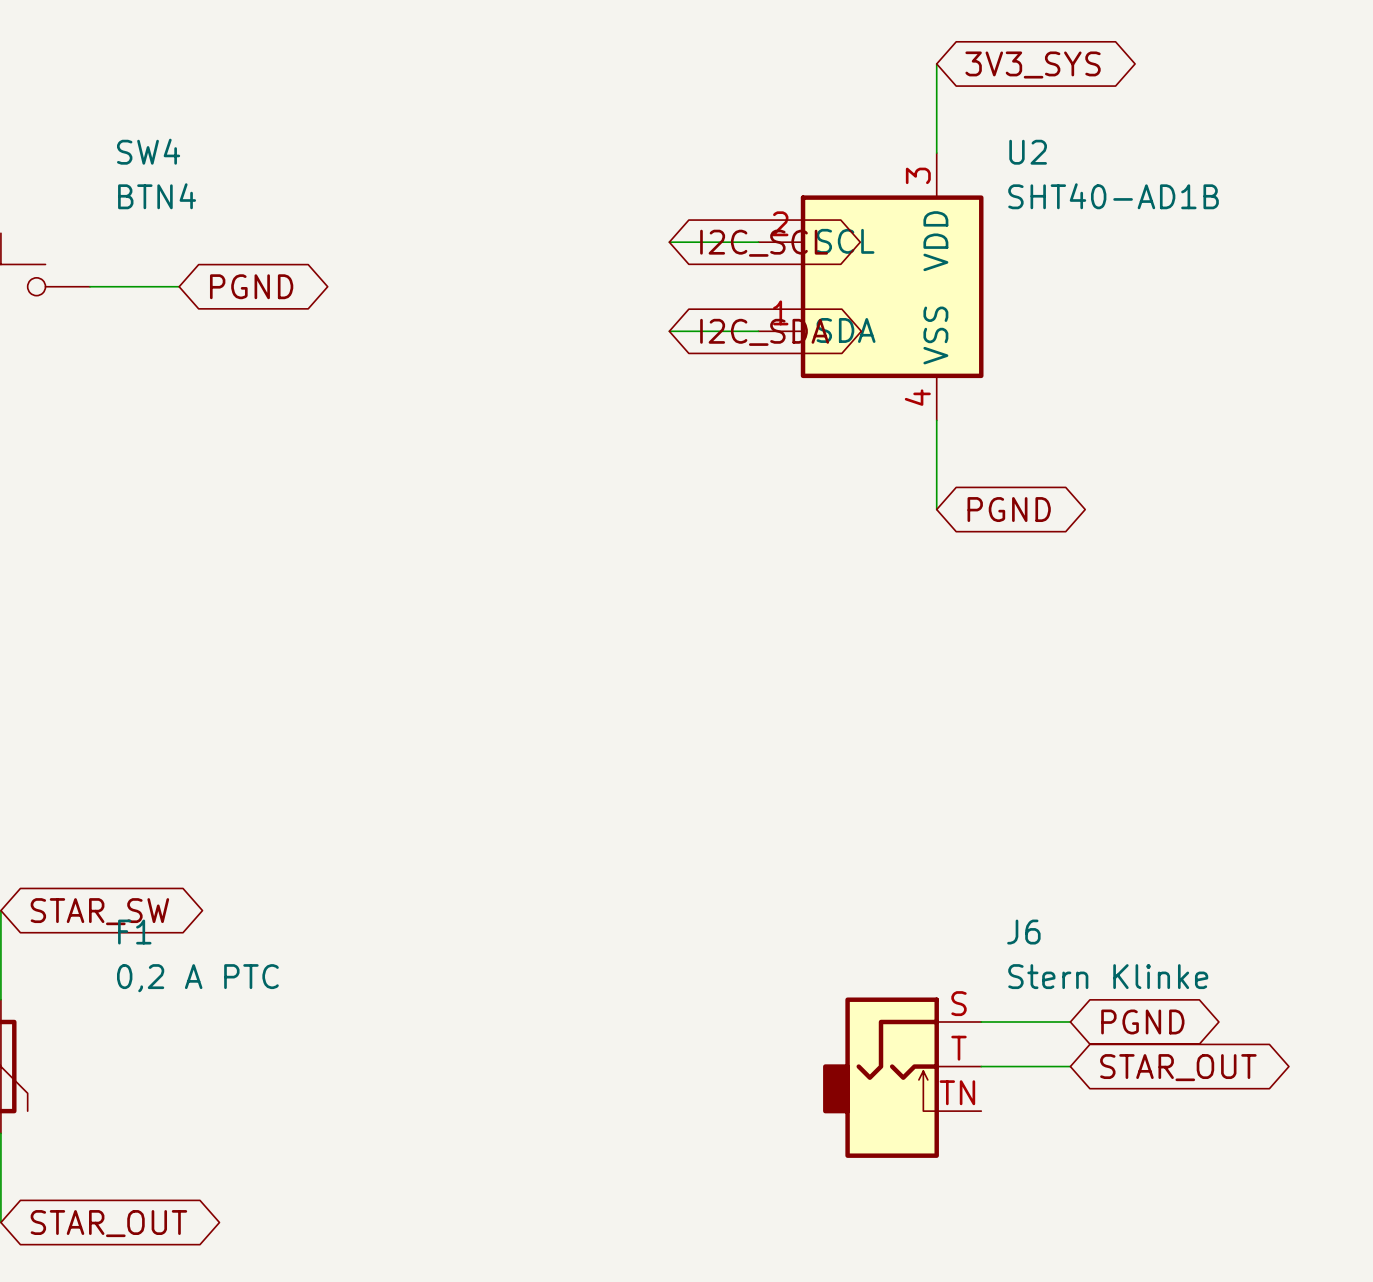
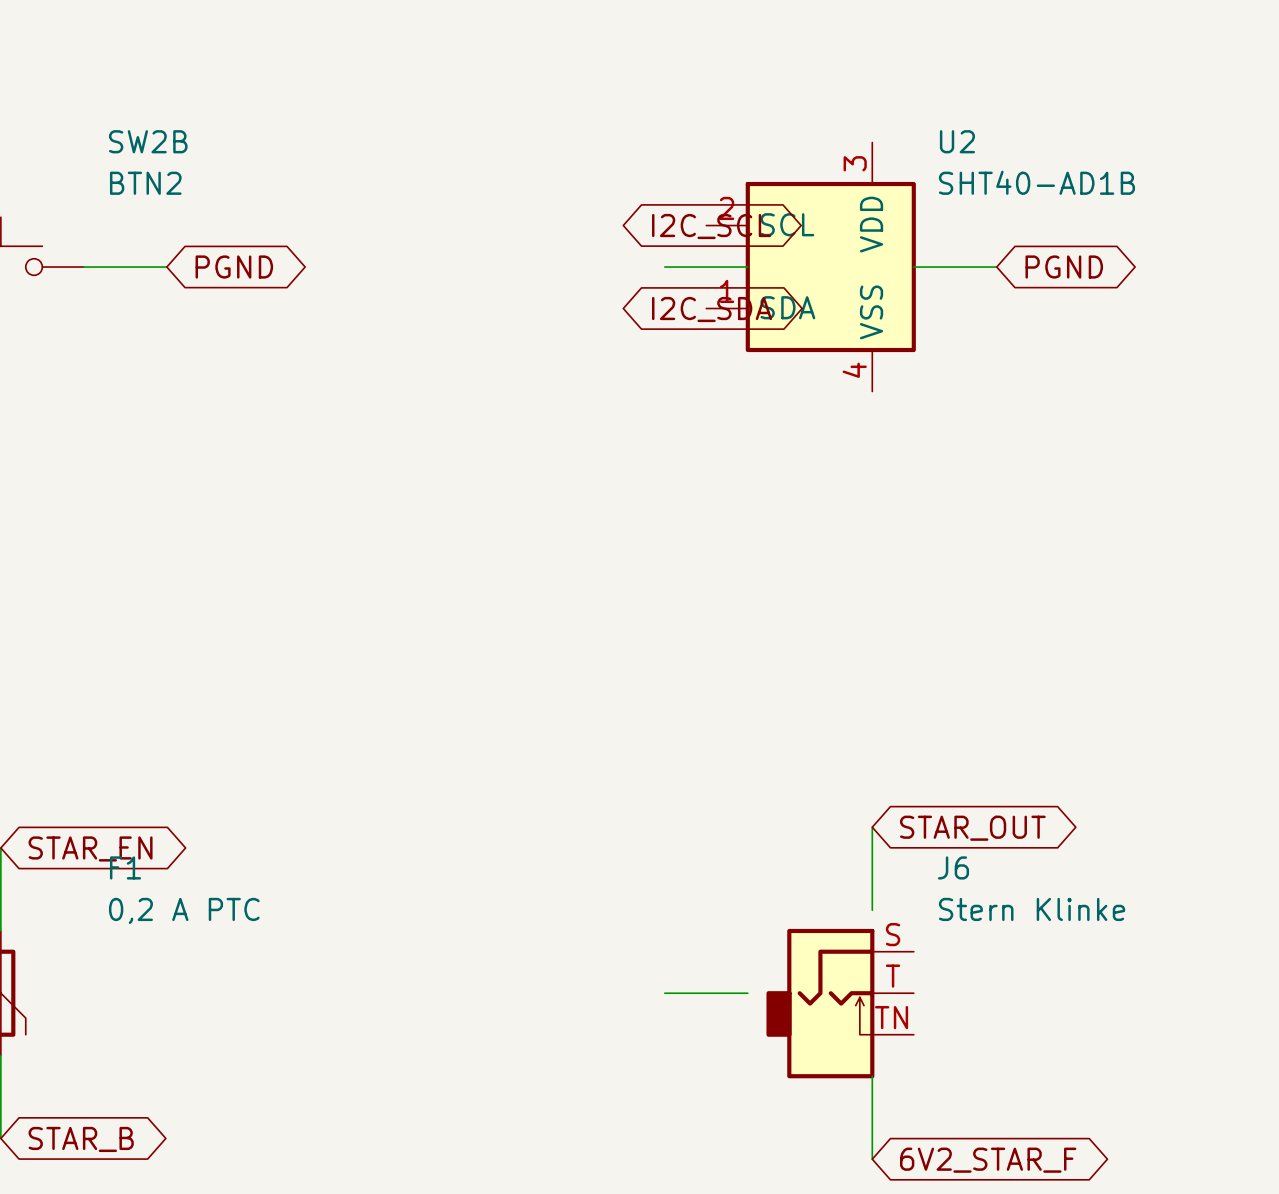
wire: (936, 63) (936, 153) -> none
global label: 3V3_SYS (1033, 64) -> none
SW4 name: SW4 (148, 151) -> SW2B (148, 141)
SW4 value: BTN4 (157, 196) -> BTN2 (145, 183)
wire: (669, 242) (758, 242) -> (664, 267) (747, 267)
wire: (669, 331) (758, 331) -> (913, 267) (996, 267)
wire: (936, 420) (936, 509) -> none
global label position: PGND (1009, 509) -> PGND (1064, 267)
wire: none -> (872, 827) (872, 910)
global label: STAR_SW (99, 911) -> STAR_EN (90, 848)
wire: (981, 1021) (1070, 1021) -> none
global label: PGND (1142, 1021) -> none
wire: (981, 1066) (1070, 1066) -> (664, 993) (747, 993)
global label position: STAR_OUT (1178, 1067) -> STAR_OUT (972, 828)
wire: none -> (872, 1076) (872, 1159)
global label: STAR_OUT (108, 1223) -> STAR_B (81, 1139)
global label: none -> 6V2_STAR_F (988, 1160)

